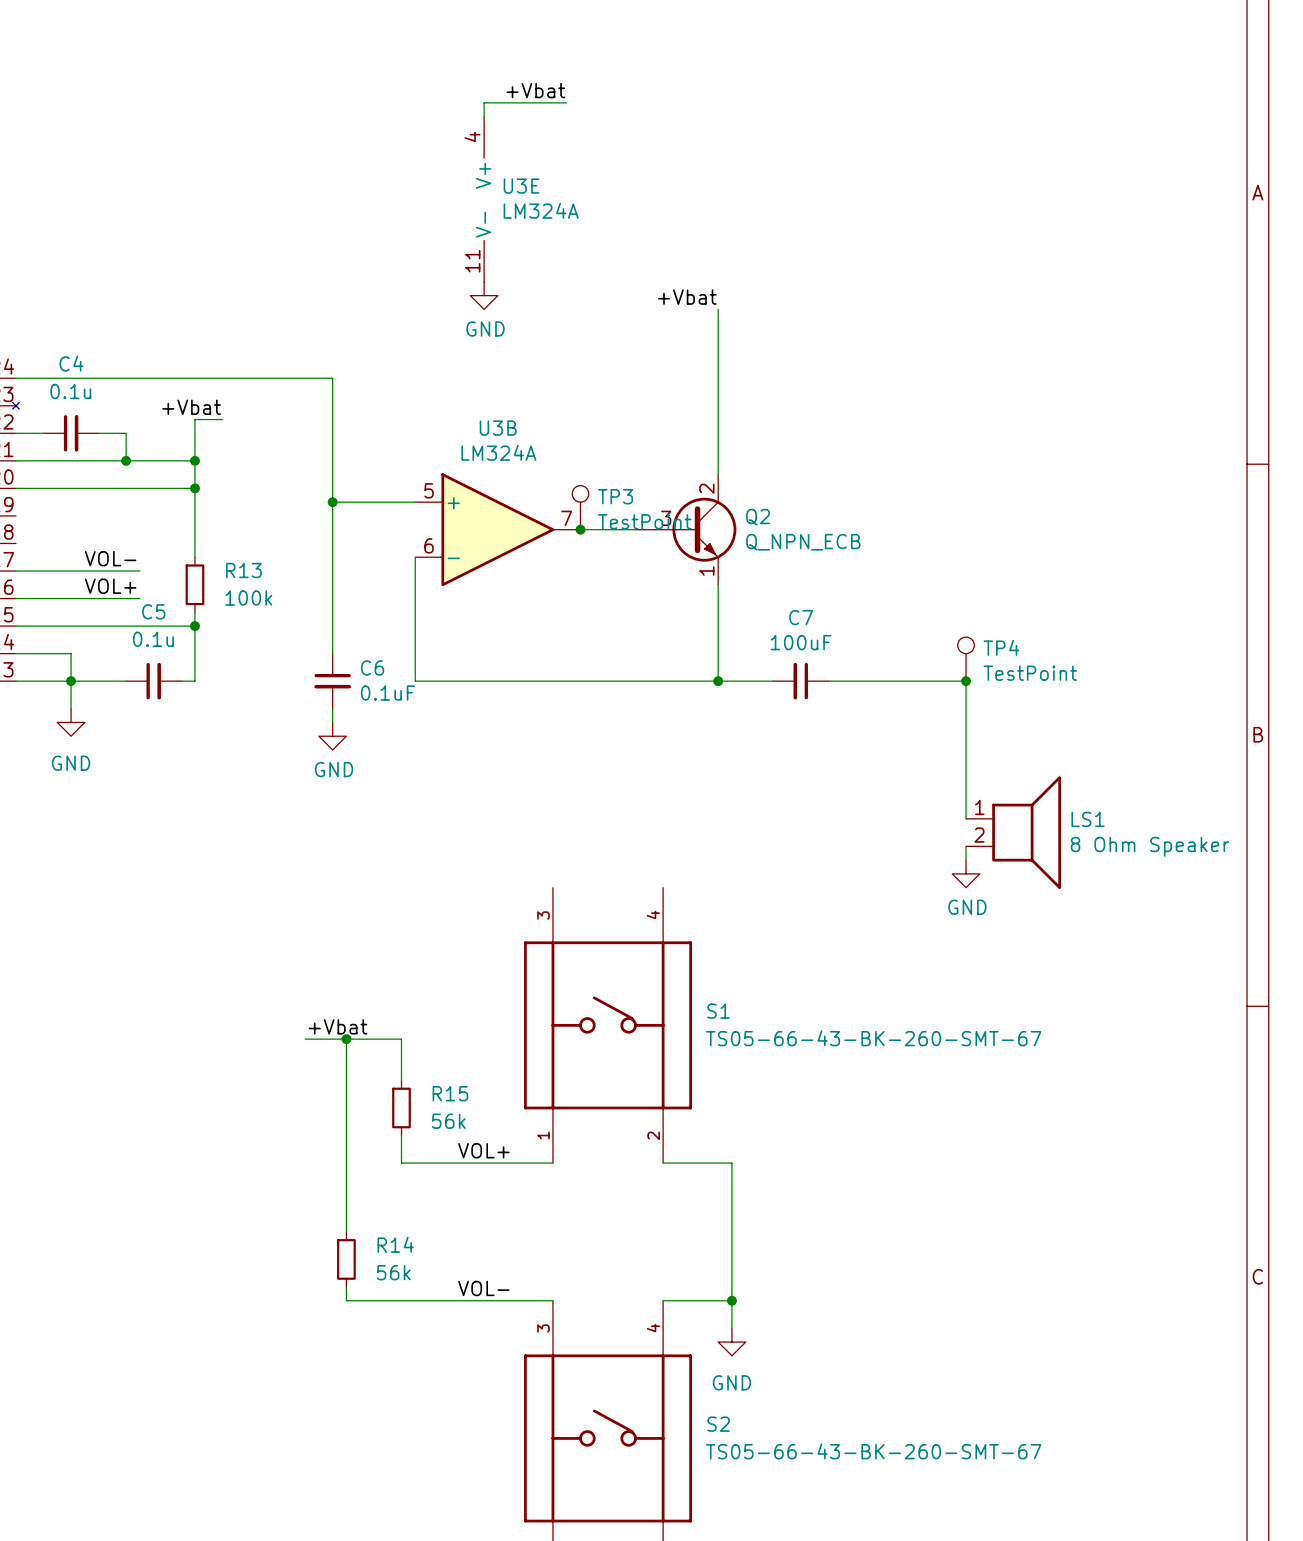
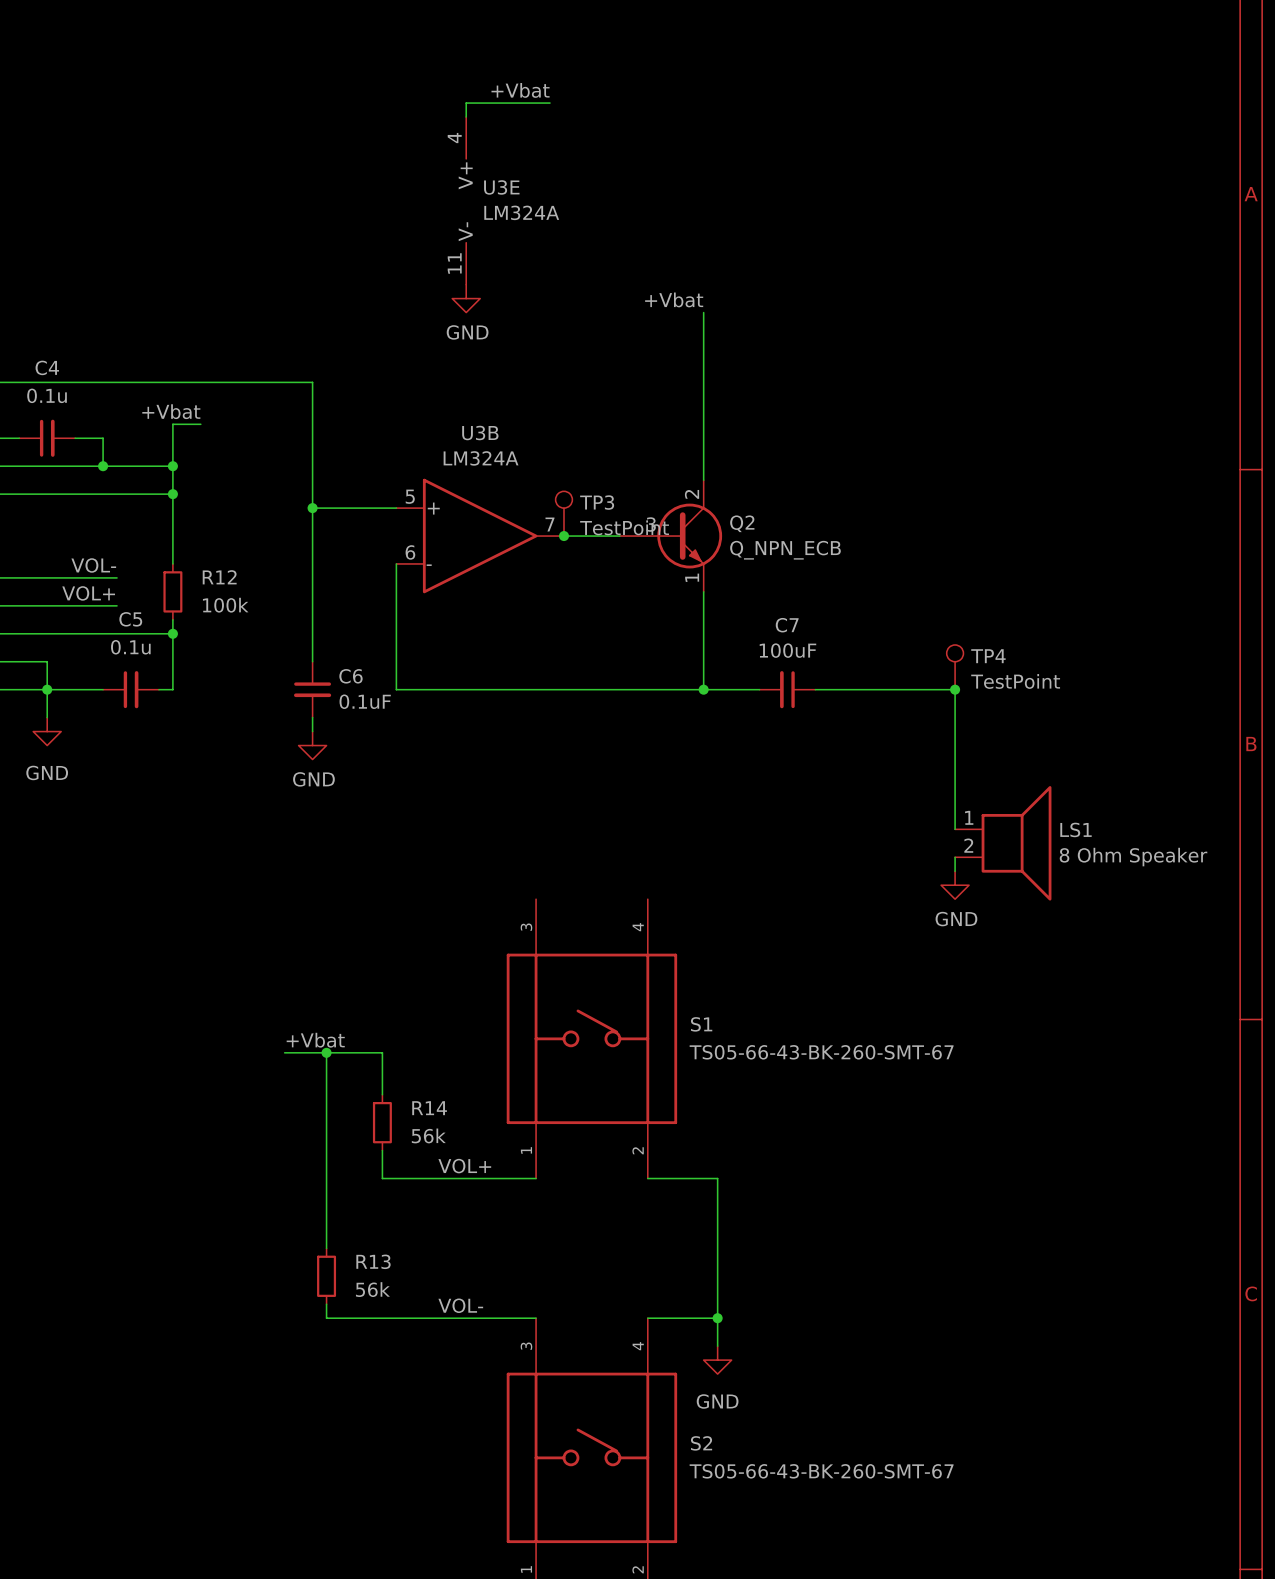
R13 name: R13 (243, 570) -> R12 (219, 577)
R15 name: R15 (450, 1093) -> R14 (429, 1108)
R14 name: R14 (395, 1244) -> R13 (373, 1261)

